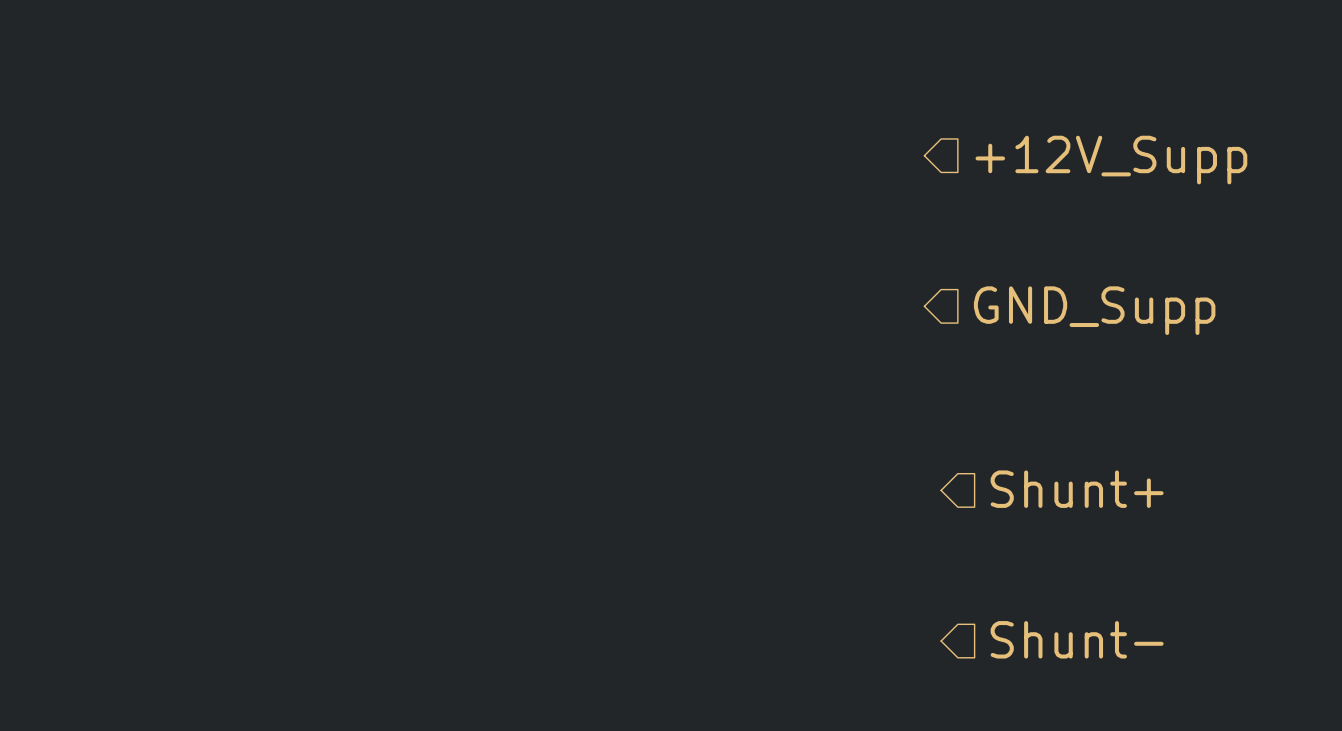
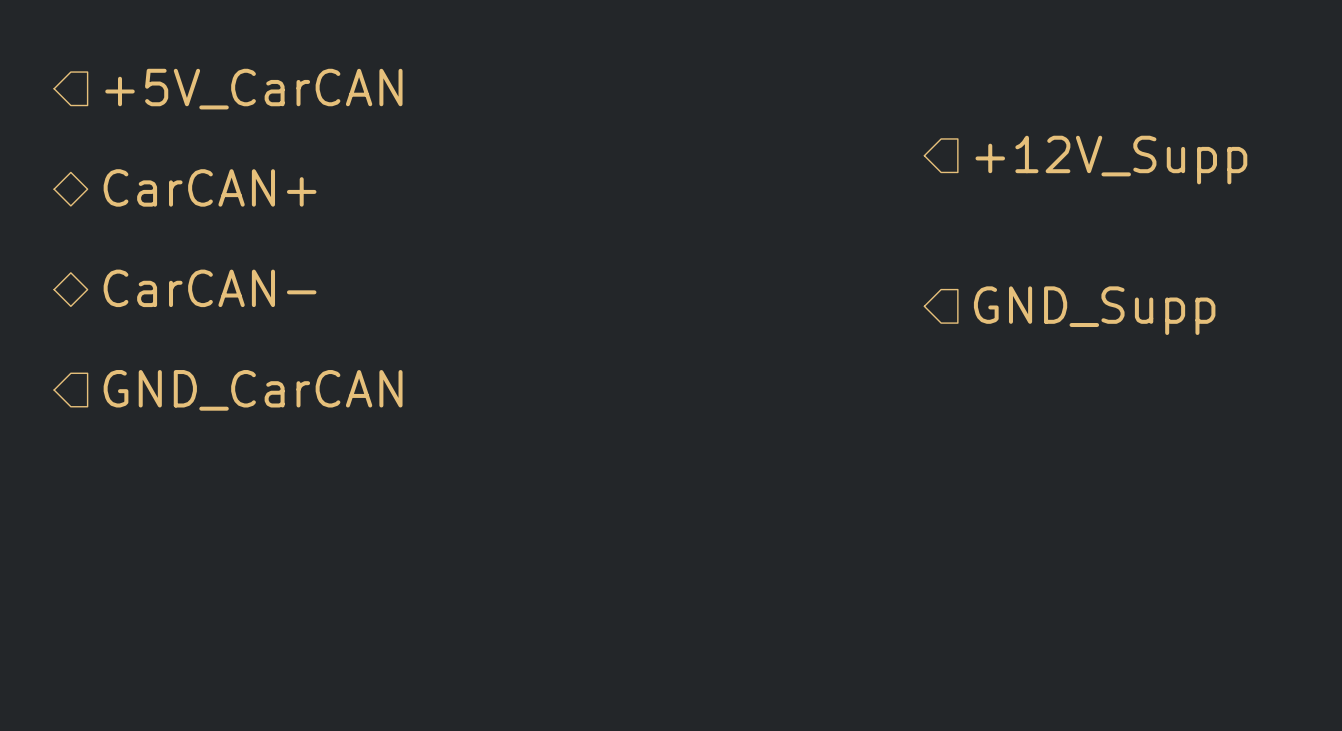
hierarchical label: none -> +5V_CarCAN (253, 89)
hierarchical label: none -> CarCAN+ (210, 187)
hierarchical label: none -> CarCAN- (210, 288)
hierarchical label: none -> GND_CarCAN (253, 390)
hierarchical label: Shunt+ (1077, 489) -> none
hierarchical label: Shunt- (1077, 639) -> none

